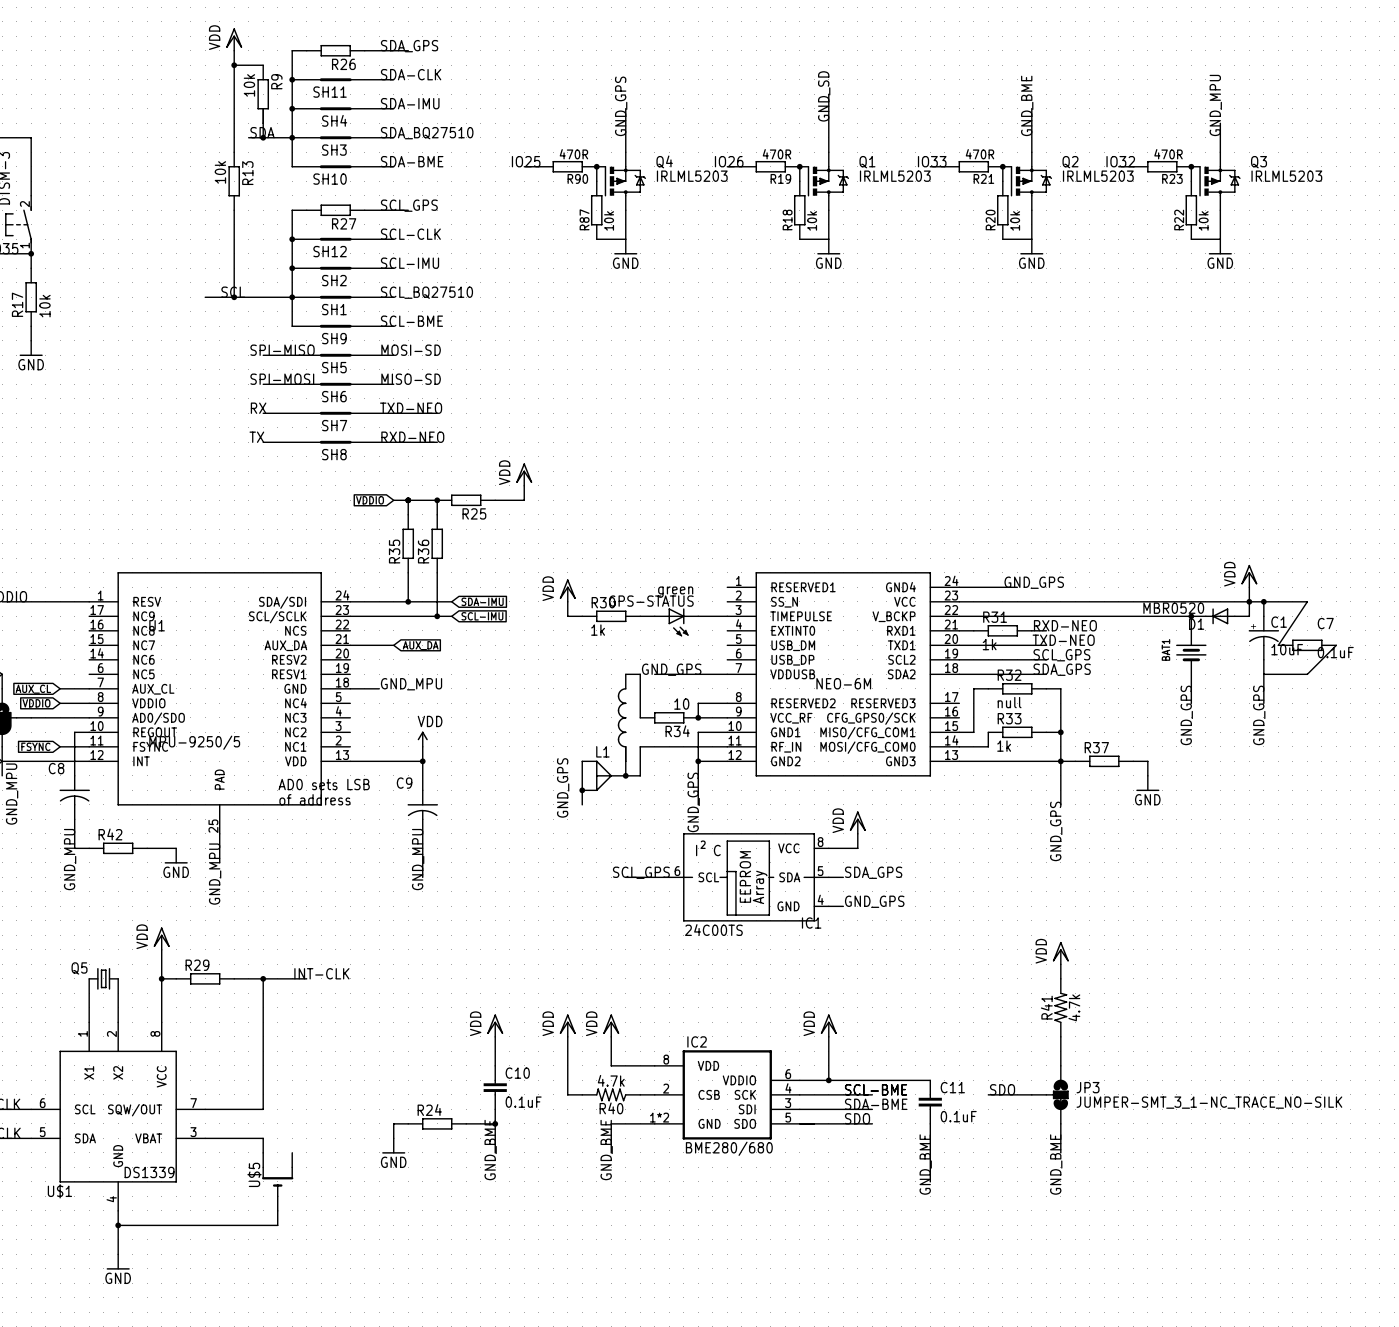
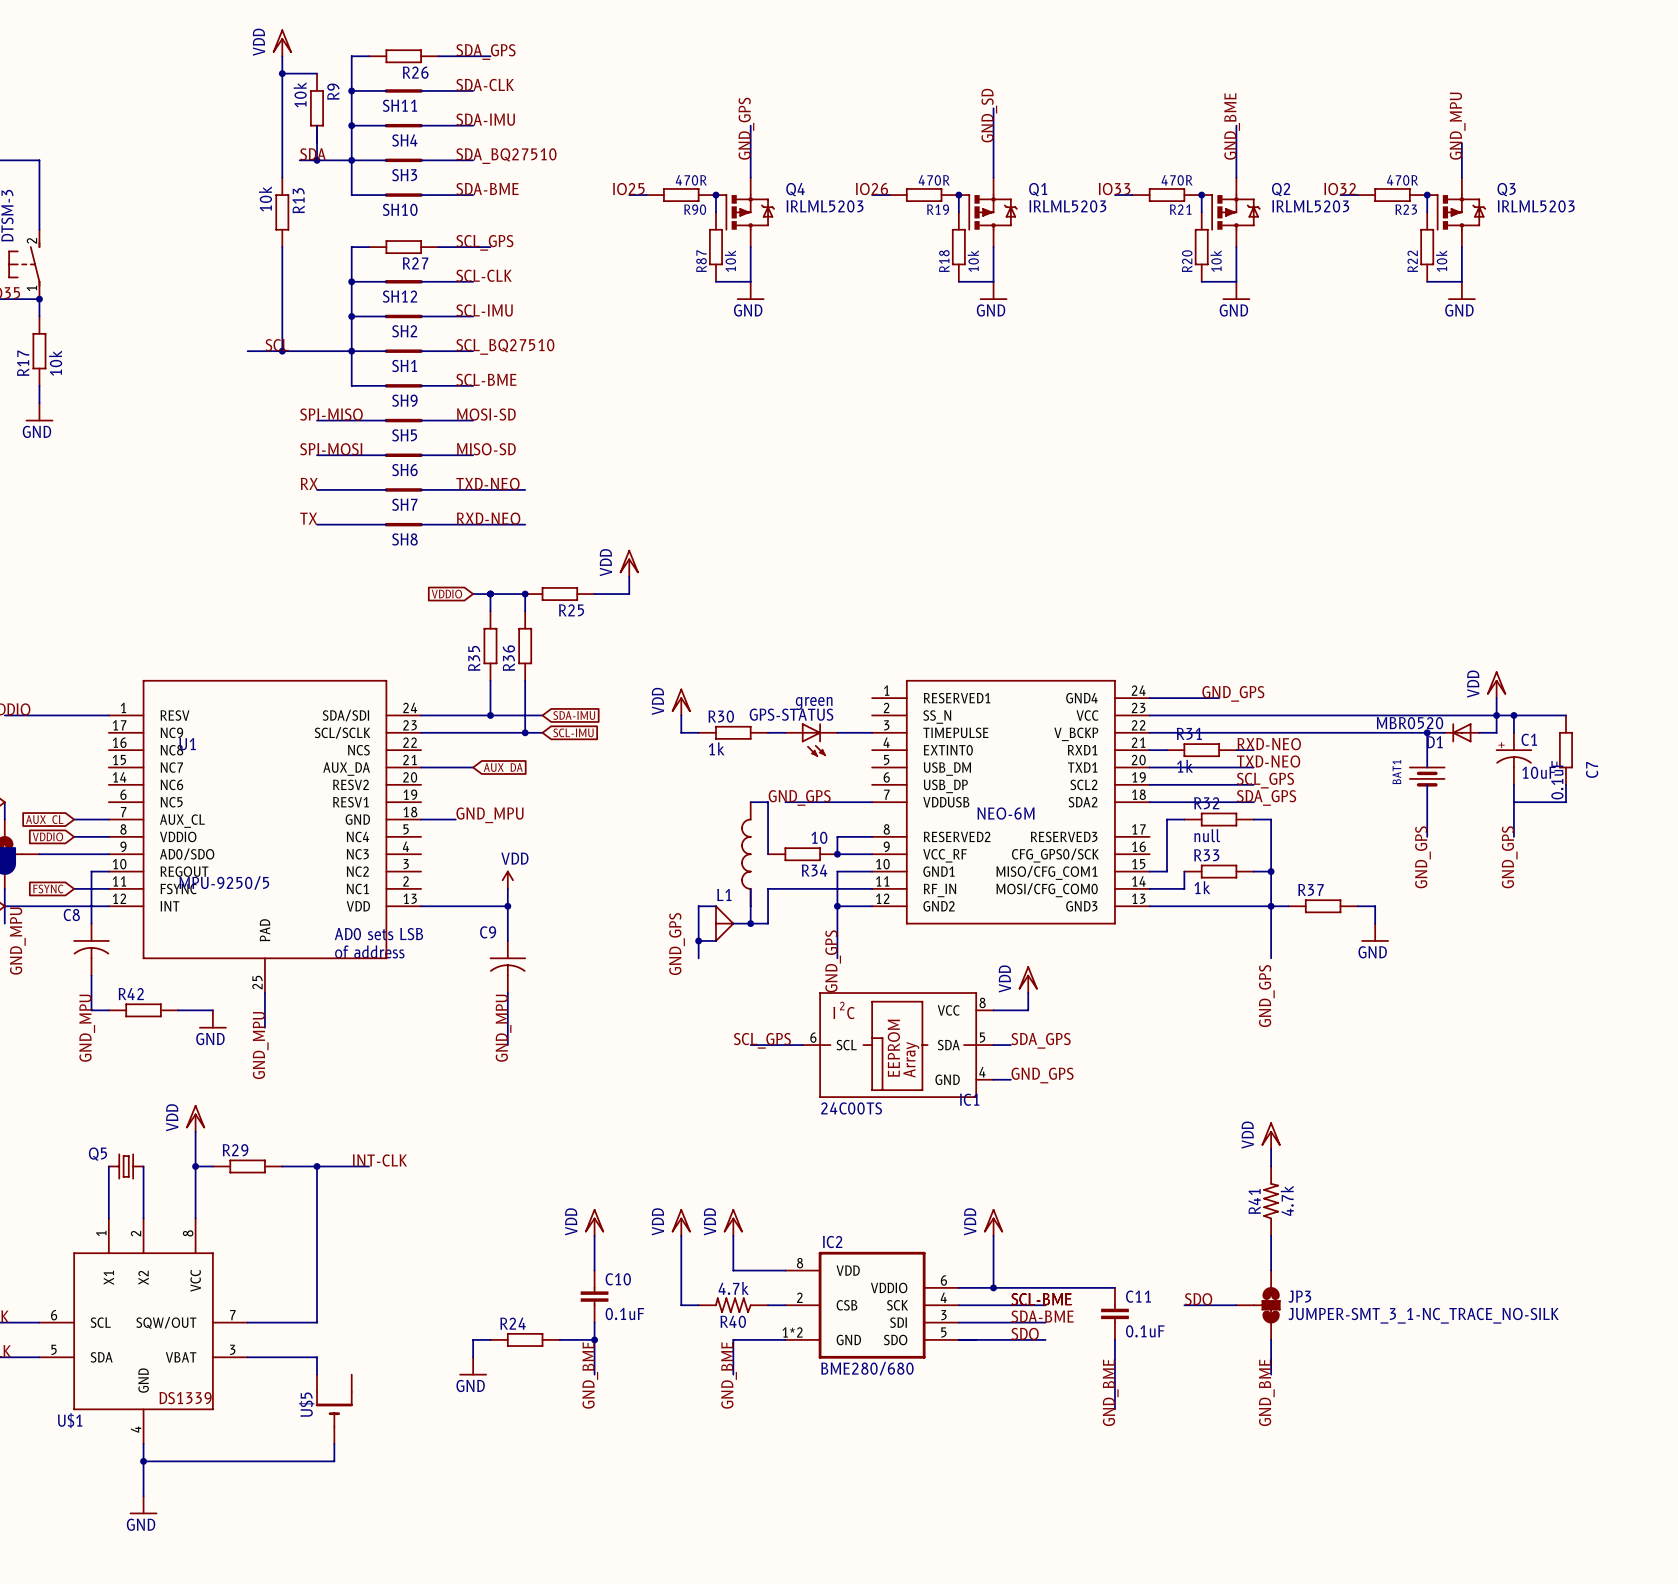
wire: (1307, 601) (1278, 645) -> none
C7 rotation: 0° (1307, 645) -> 90° clockwise (1565, 750)
wire: (1336, 645) (1307, 674) -> (1565, 784) (1565, 802)

